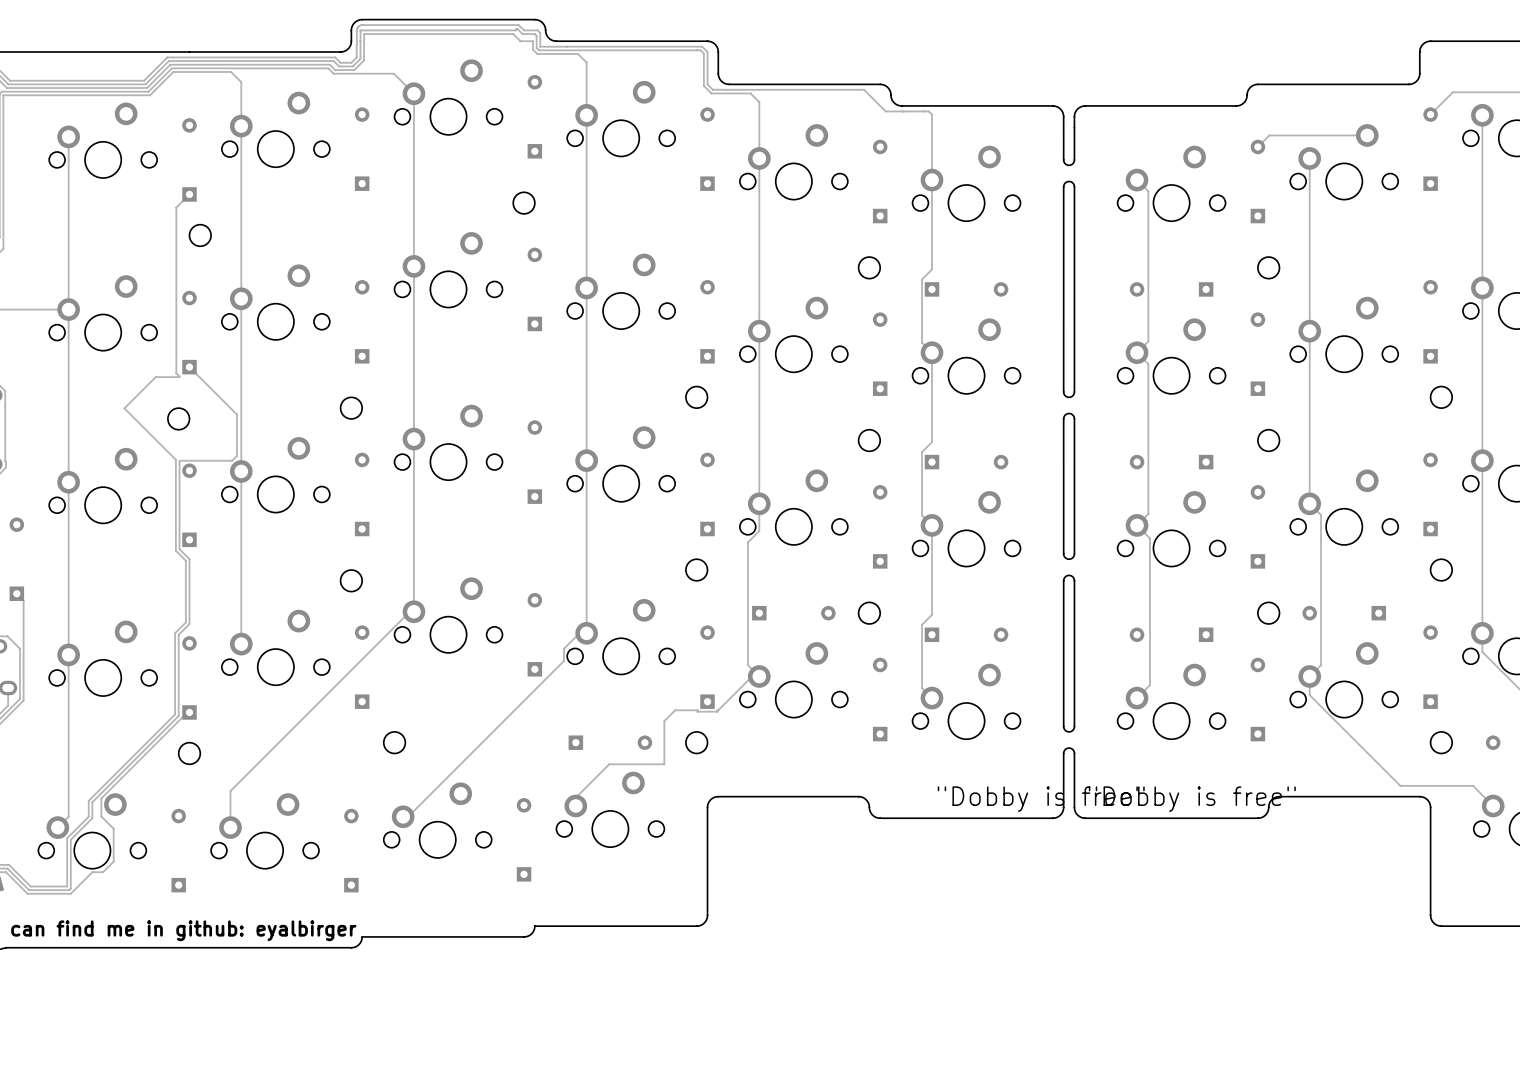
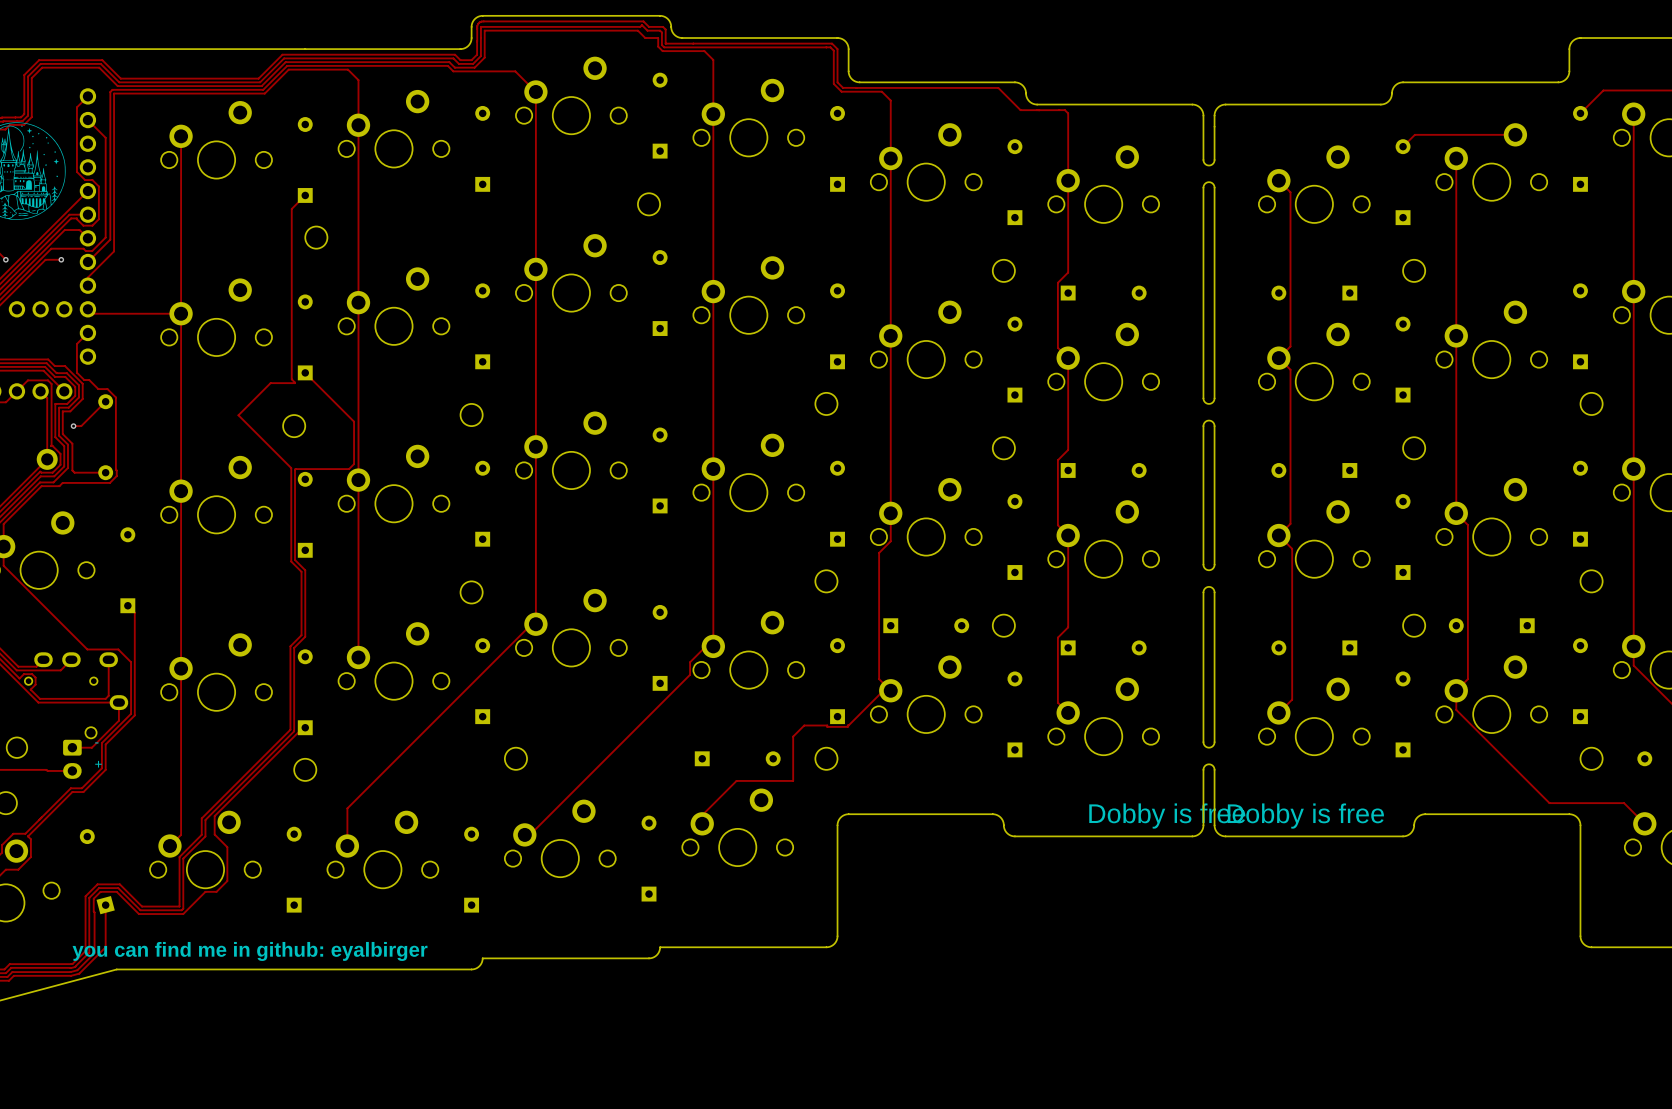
text: "Dobby is free" (1041, 799) -> Dobby is free (1167, 816)
text: "Dobby is free" (1192, 799) -> Dobby is free (1305, 816)

